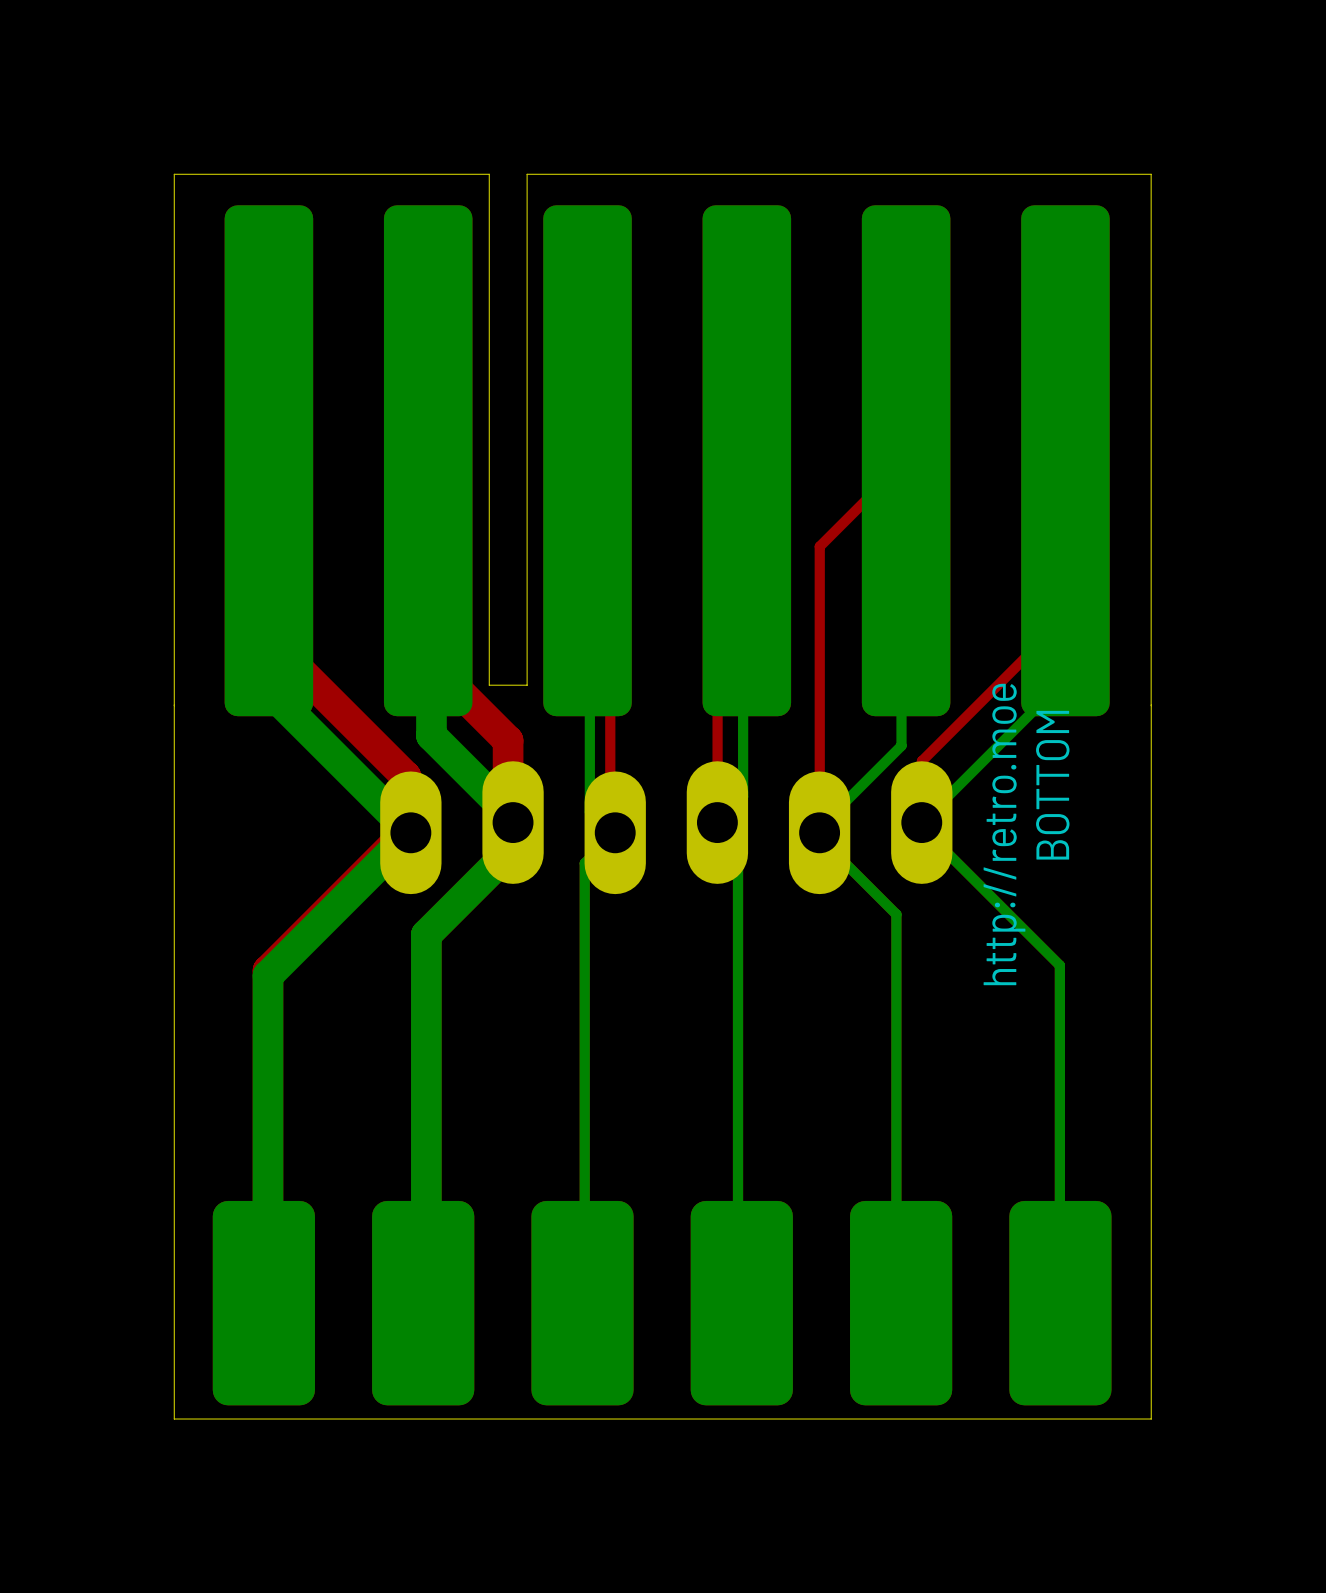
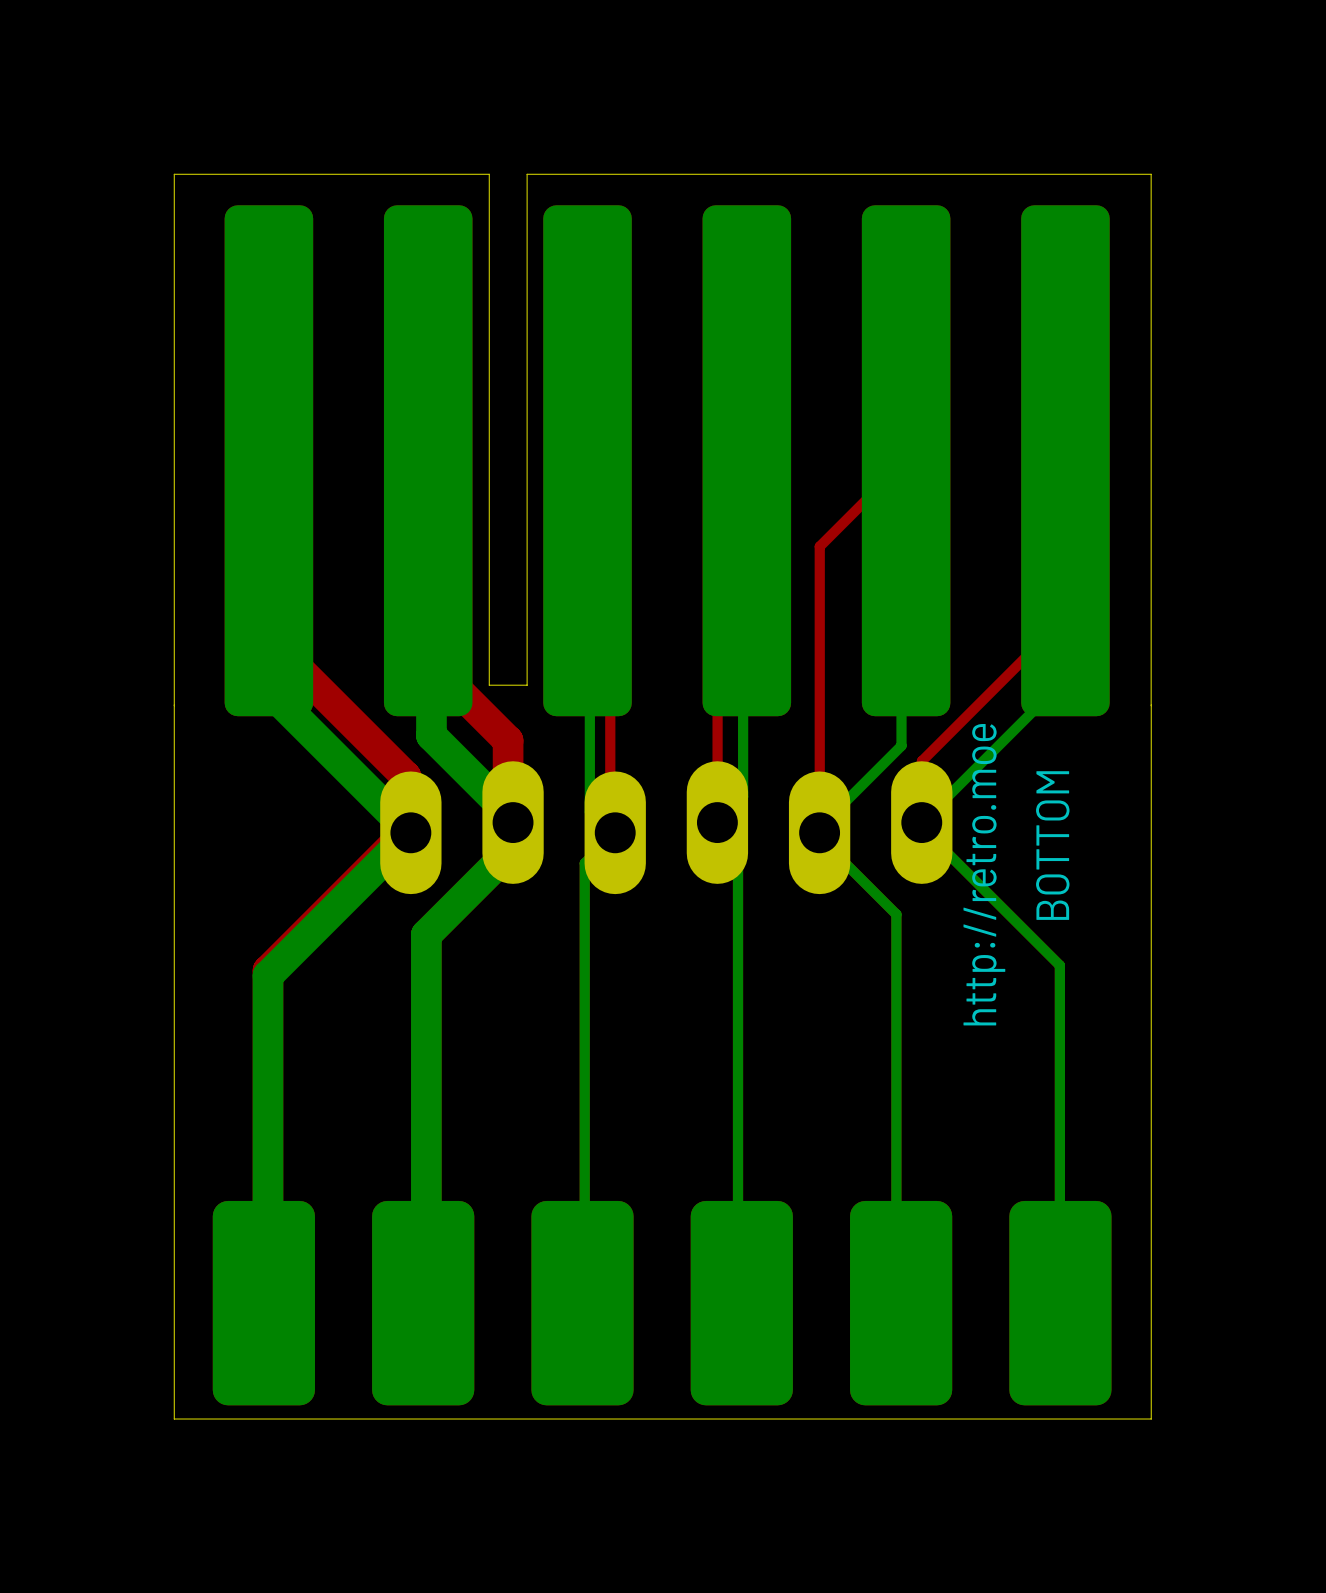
text position: BOTTOM (1052, 785) -> BOTTOM (1052, 845)
text position: http://retro.moe (1004, 834) -> http://retro.moe (984, 874)

